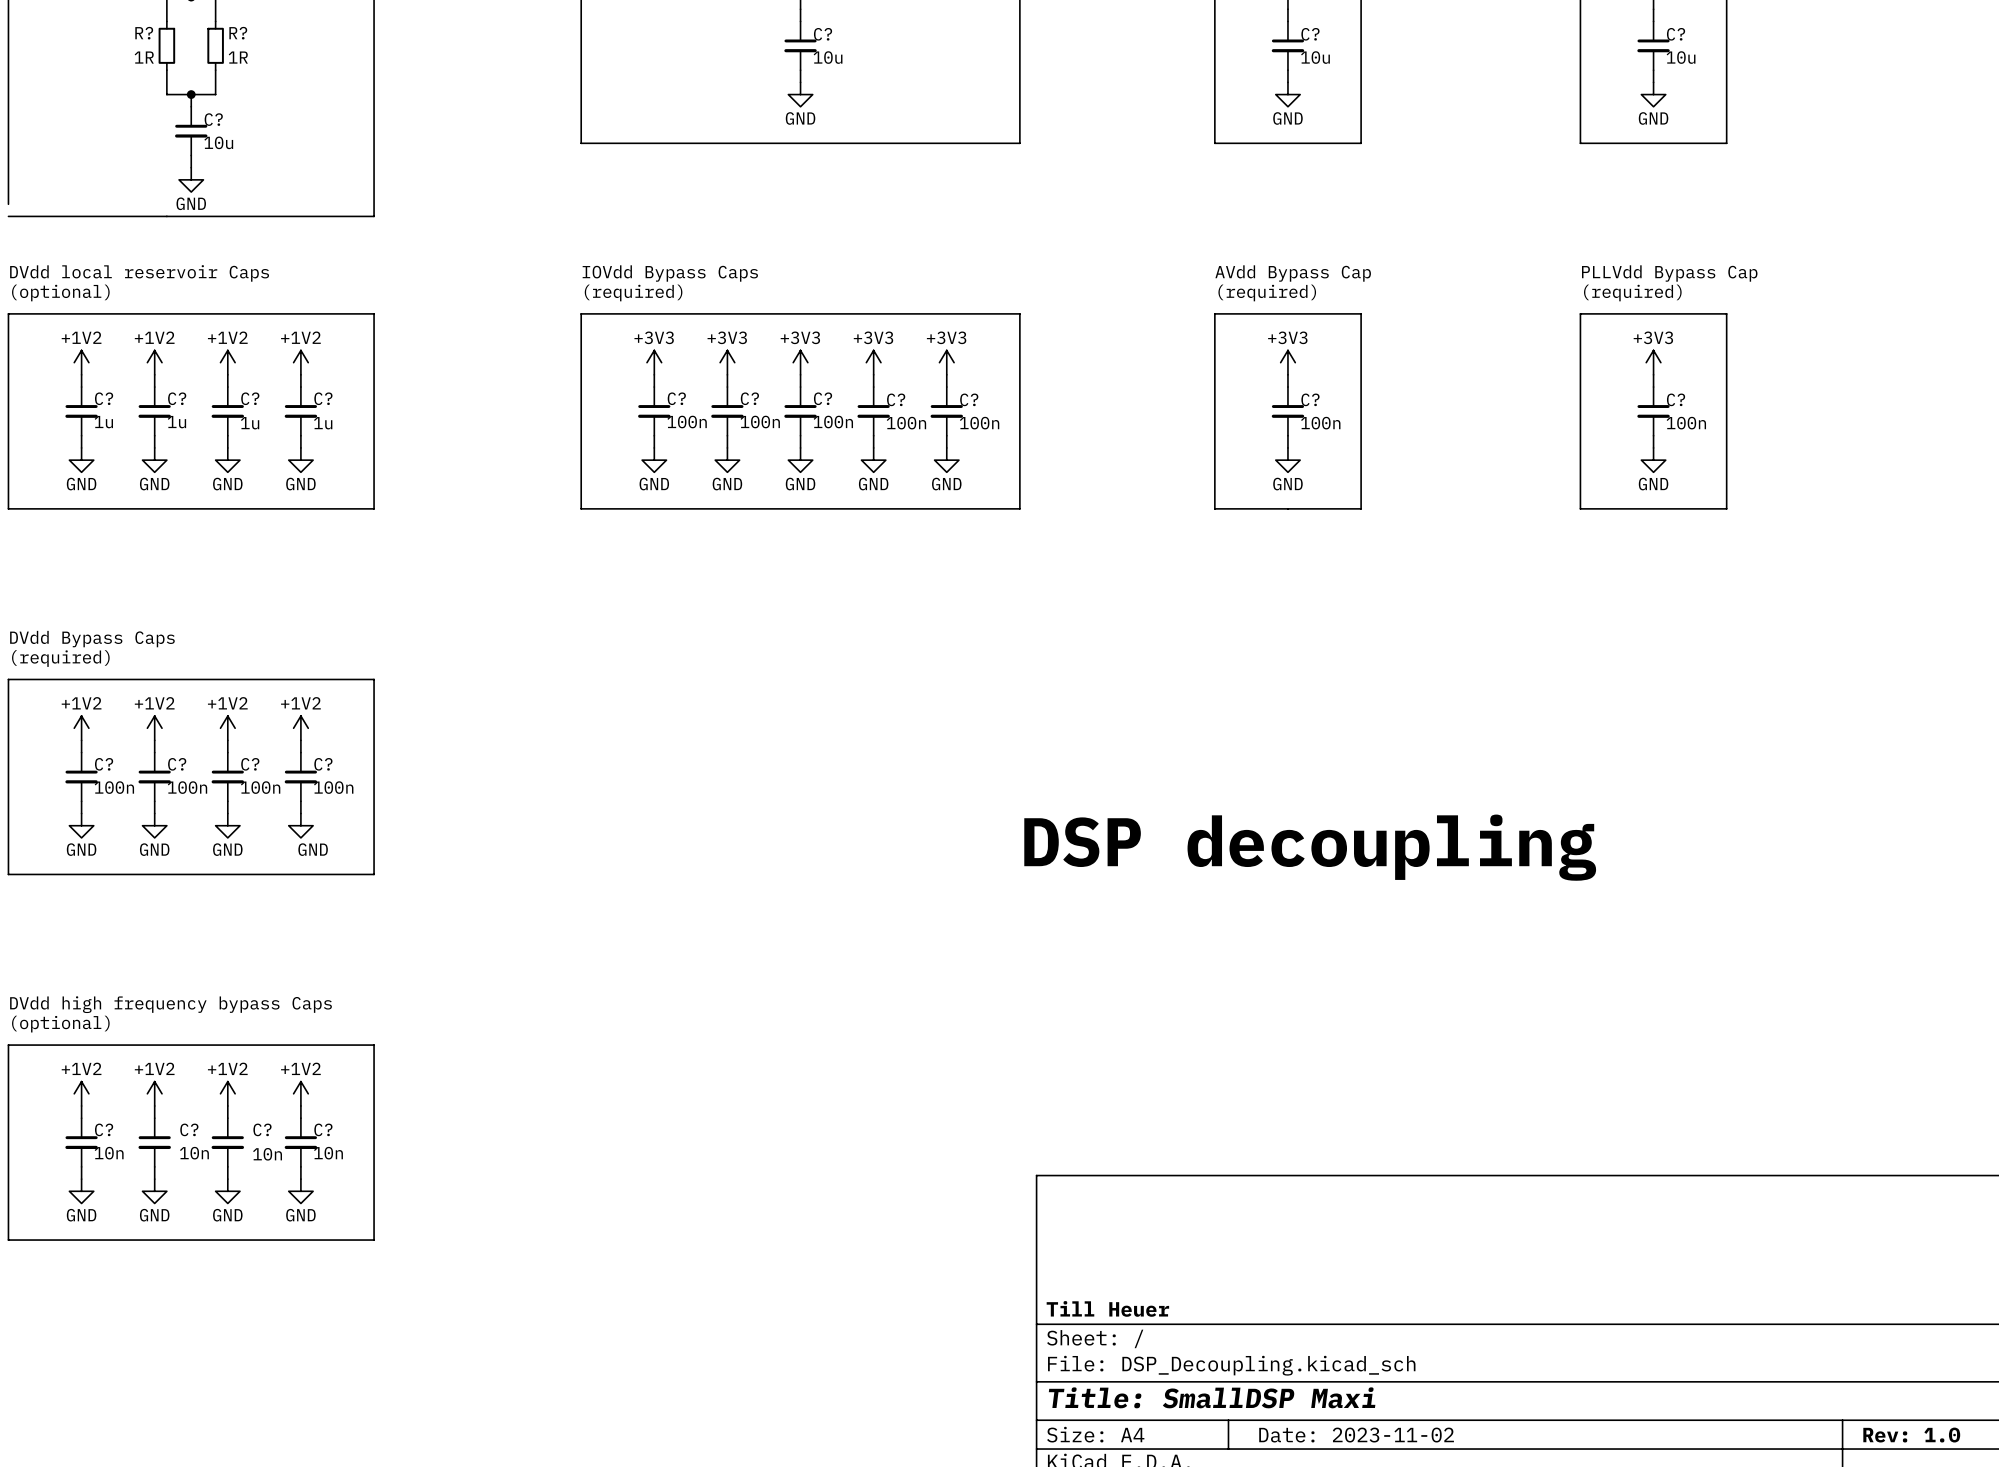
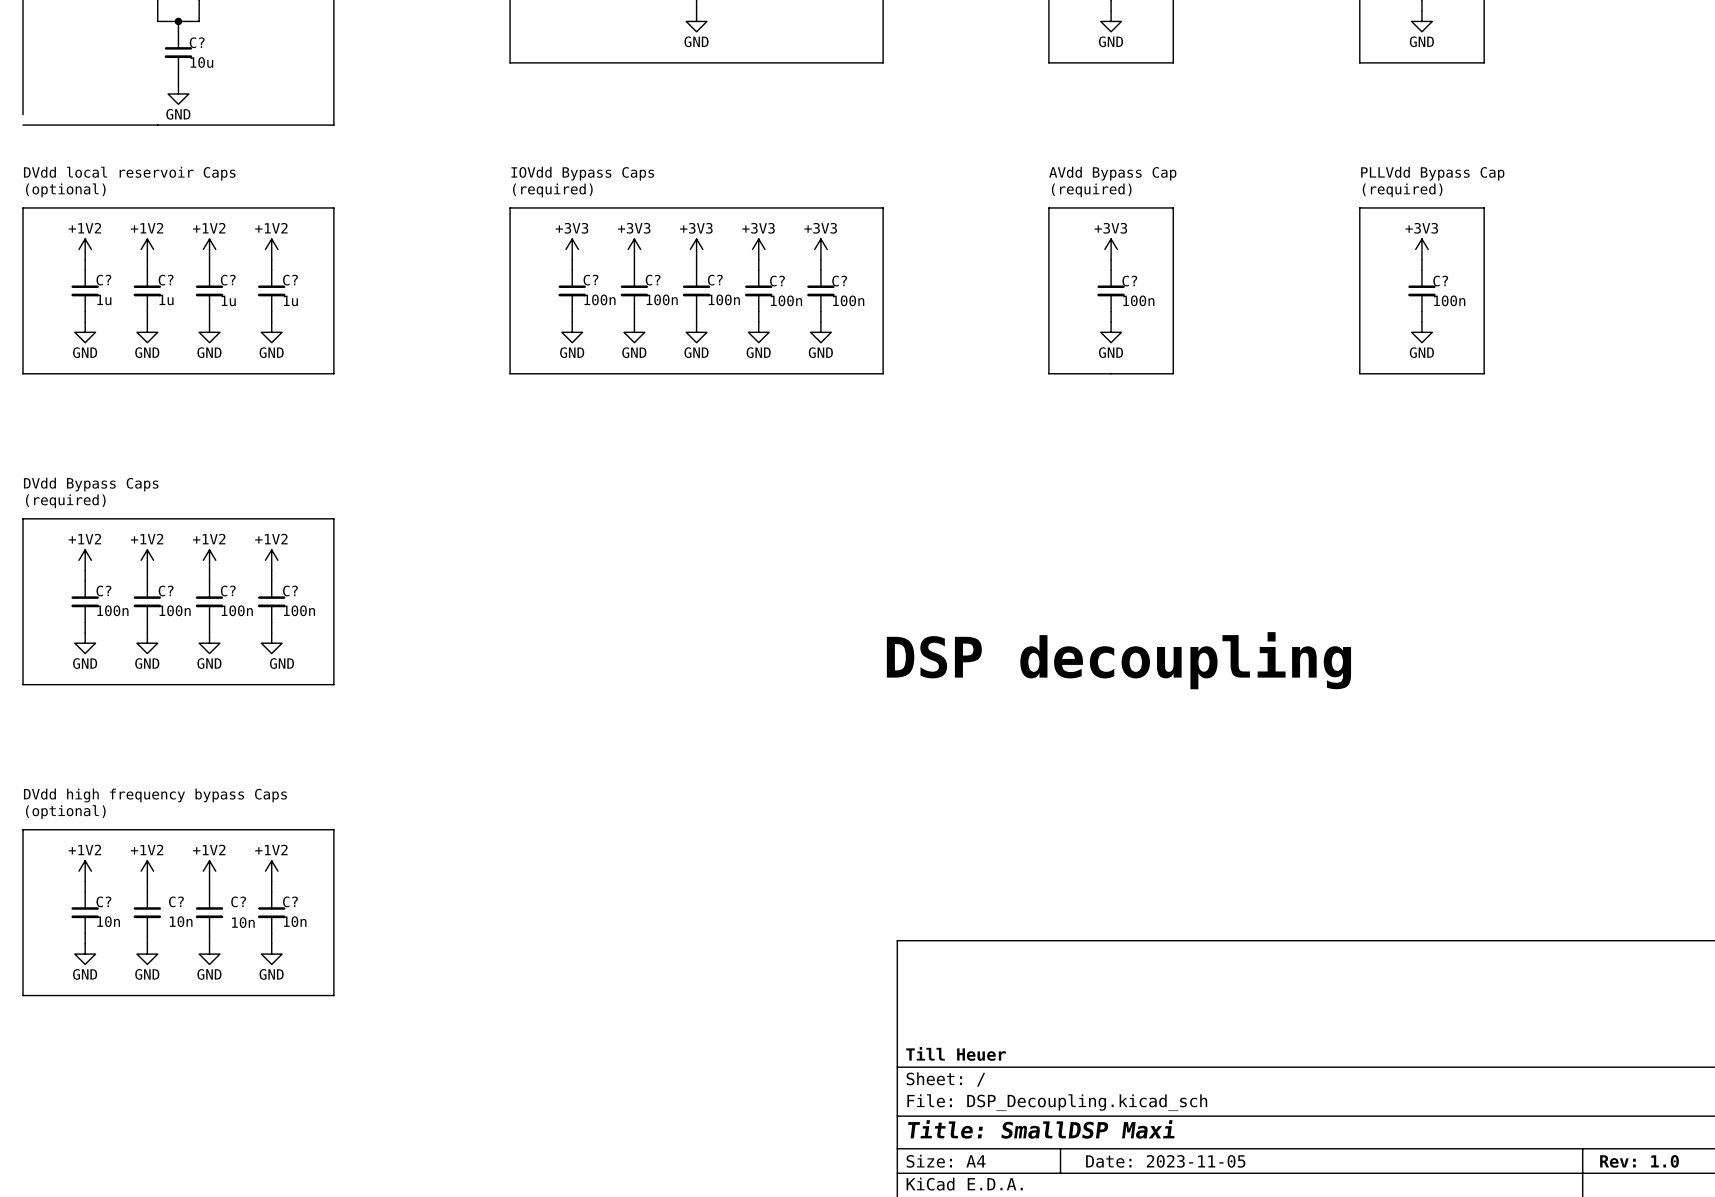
title block: Date: 2023-11-02 (1356, 1435) -> Date: 2023-11-05 (1165, 1161)

